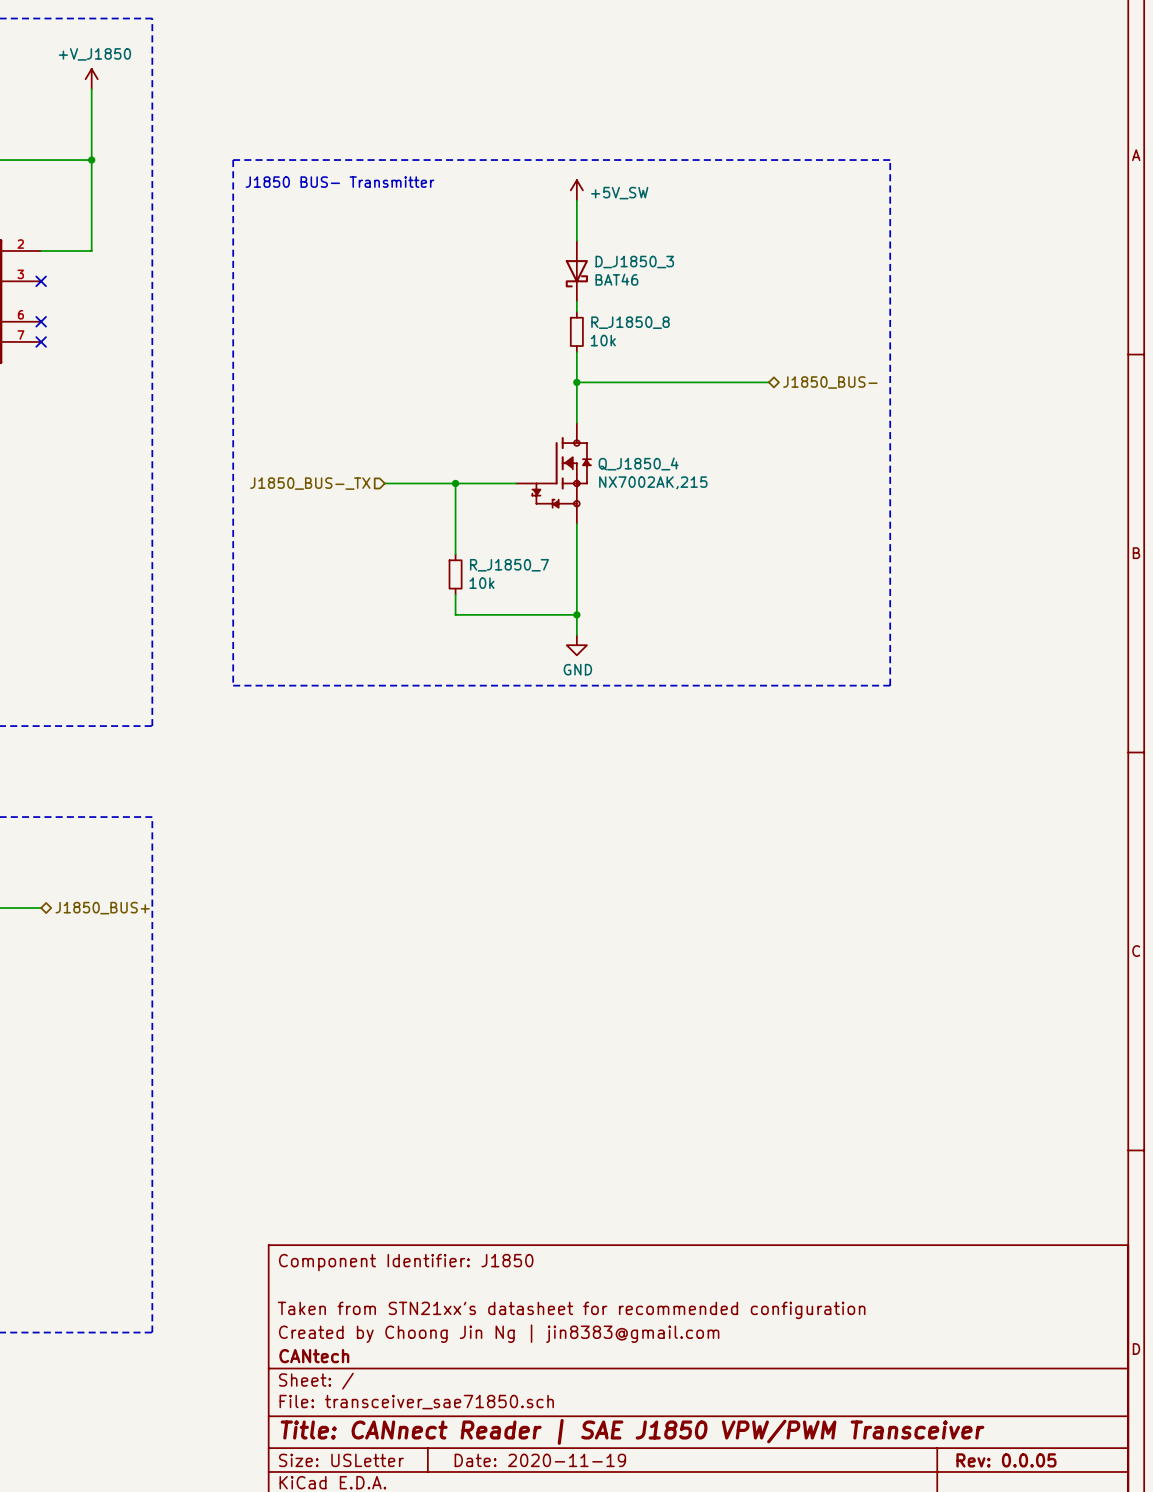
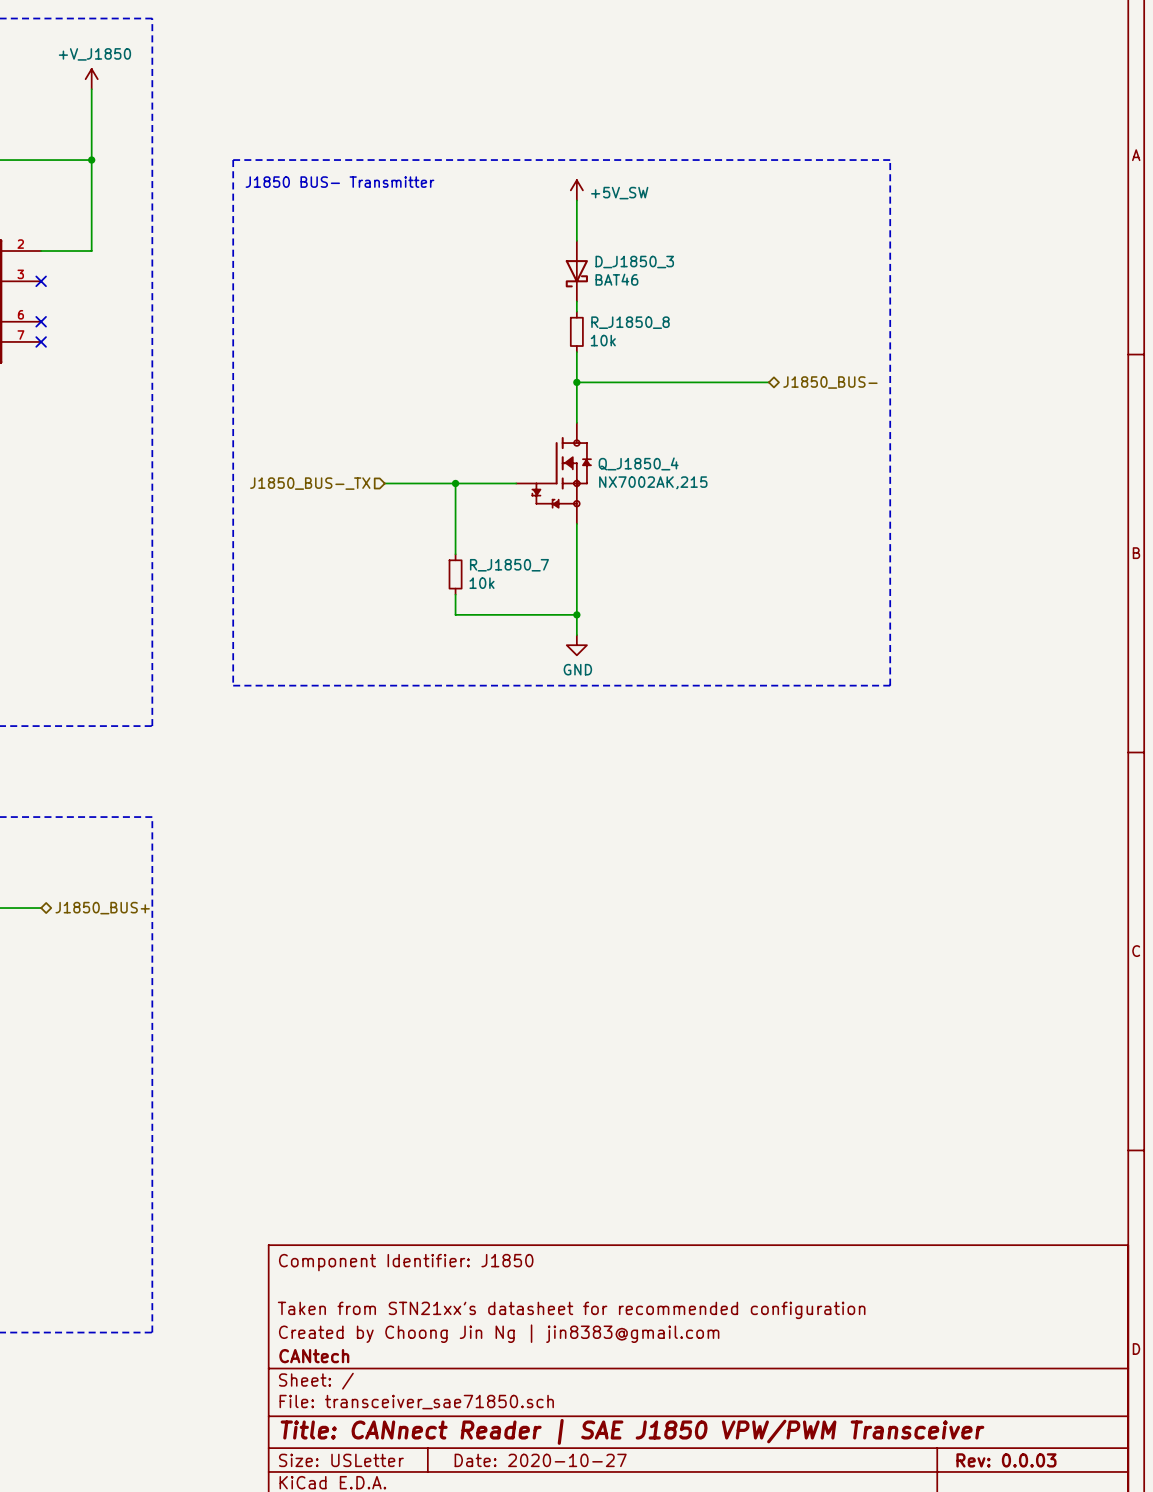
title block: Date: 2020-11-19 (540, 1460) -> Date: 2020-10-27 (540, 1460)
title block: Rev: 0.0.05 (1006, 1460) -> Rev: 0.0.03 (1006, 1460)

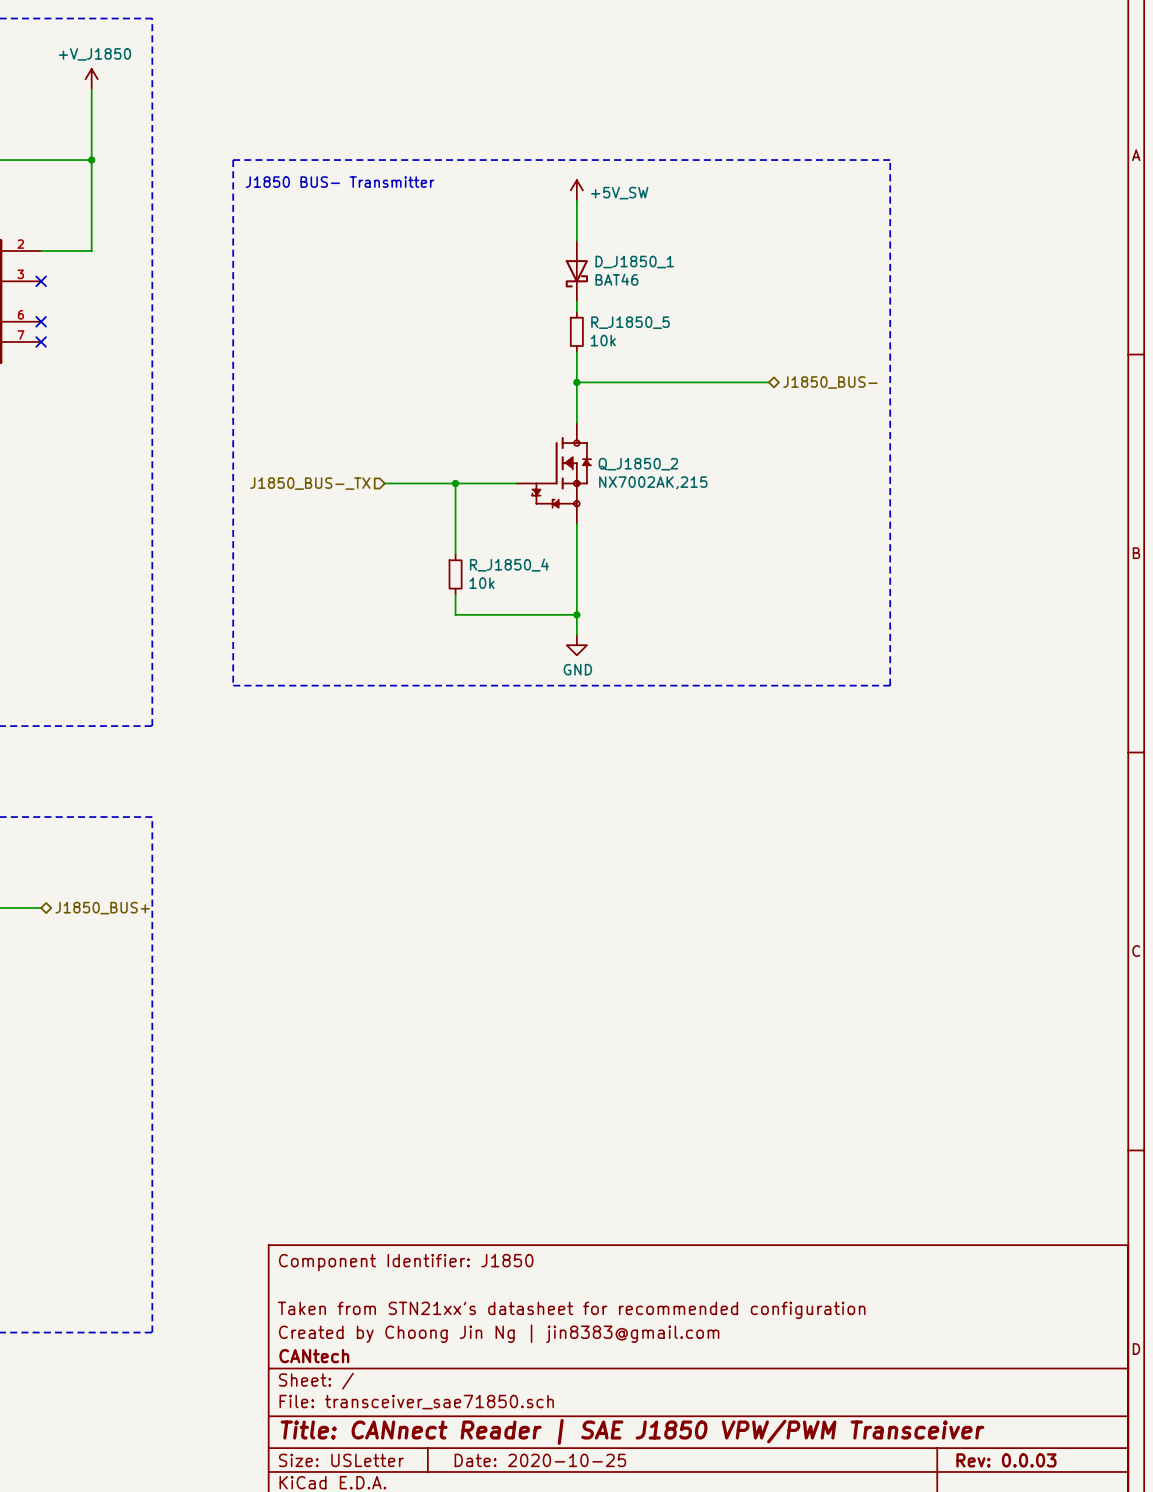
D_J1850_3 name: D_J1850_3 (634, 262) -> D_J1850_1 (634, 262)
R_J1850_8 name: R_J1850_8 (630, 322) -> R_J1850_5 (630, 322)
Q_J1850_4 name: Q_J1850_4 (638, 463) -> Q_J1850_2 (638, 464)
R_J1850_7 name: R_J1850_7 (509, 565) -> R_J1850_4 (509, 565)
title block: Date: 2020-10-27 (540, 1460) -> Date: 2020-10-25 (540, 1460)

